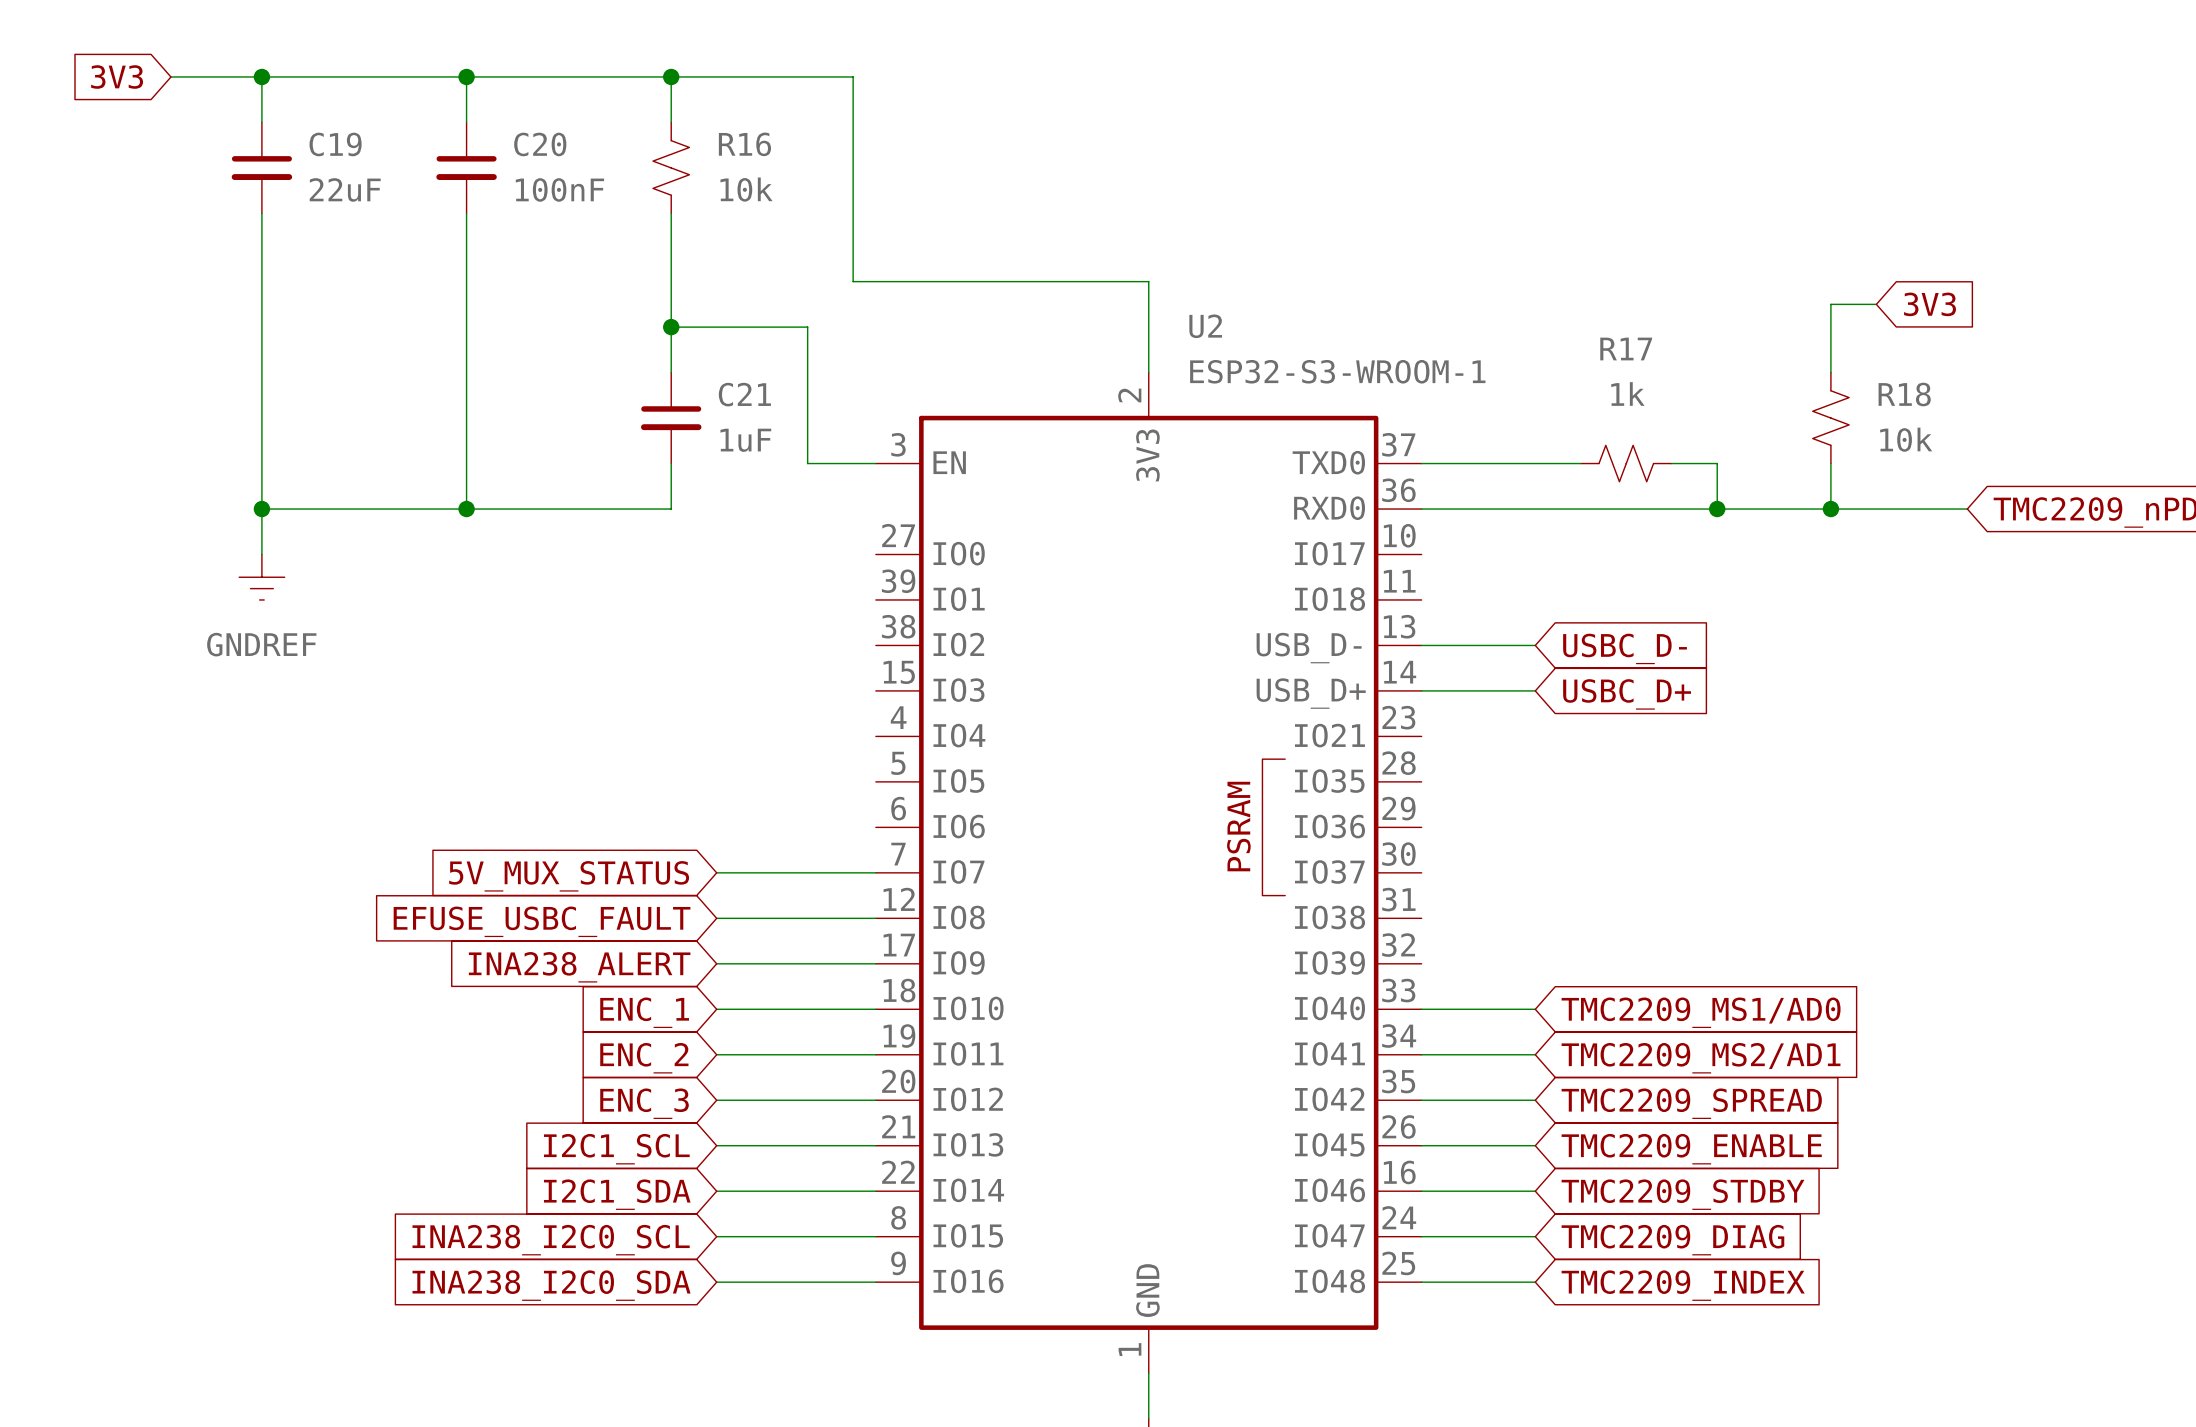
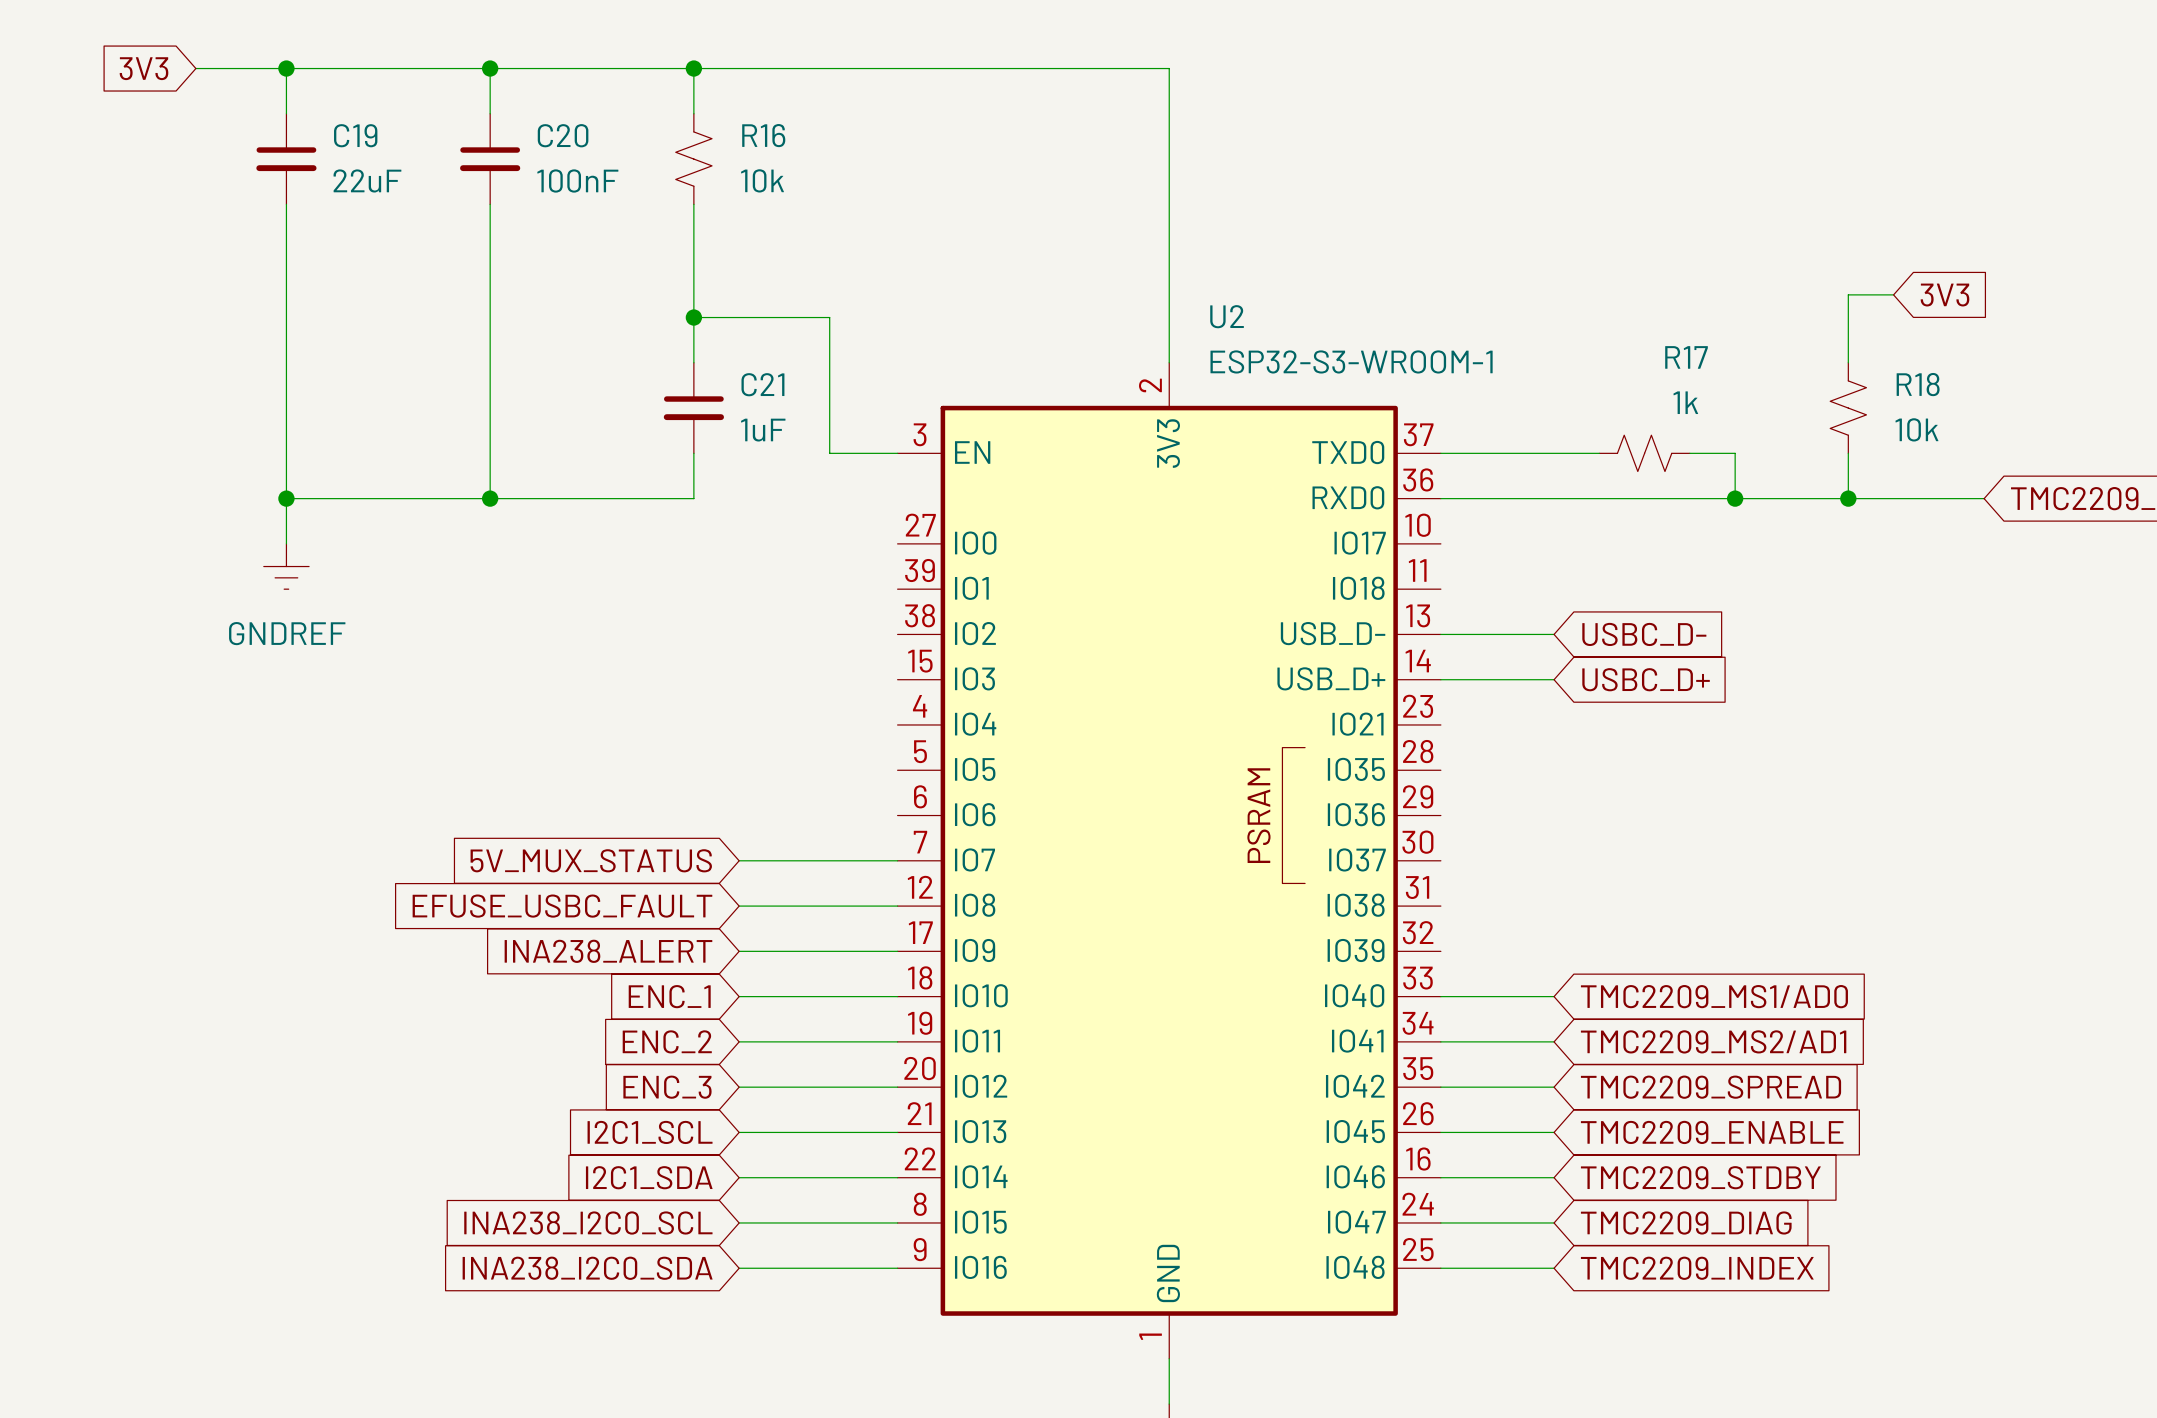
wire: (853, 76) (853, 281) (1148, 281) -> (874, 68) (1169, 68) (1169, 272)
R17 name position: R17 (1626, 349) -> R17 (1686, 357)
R17 value position: 1k (1627, 394) -> 1k (1685, 402)

